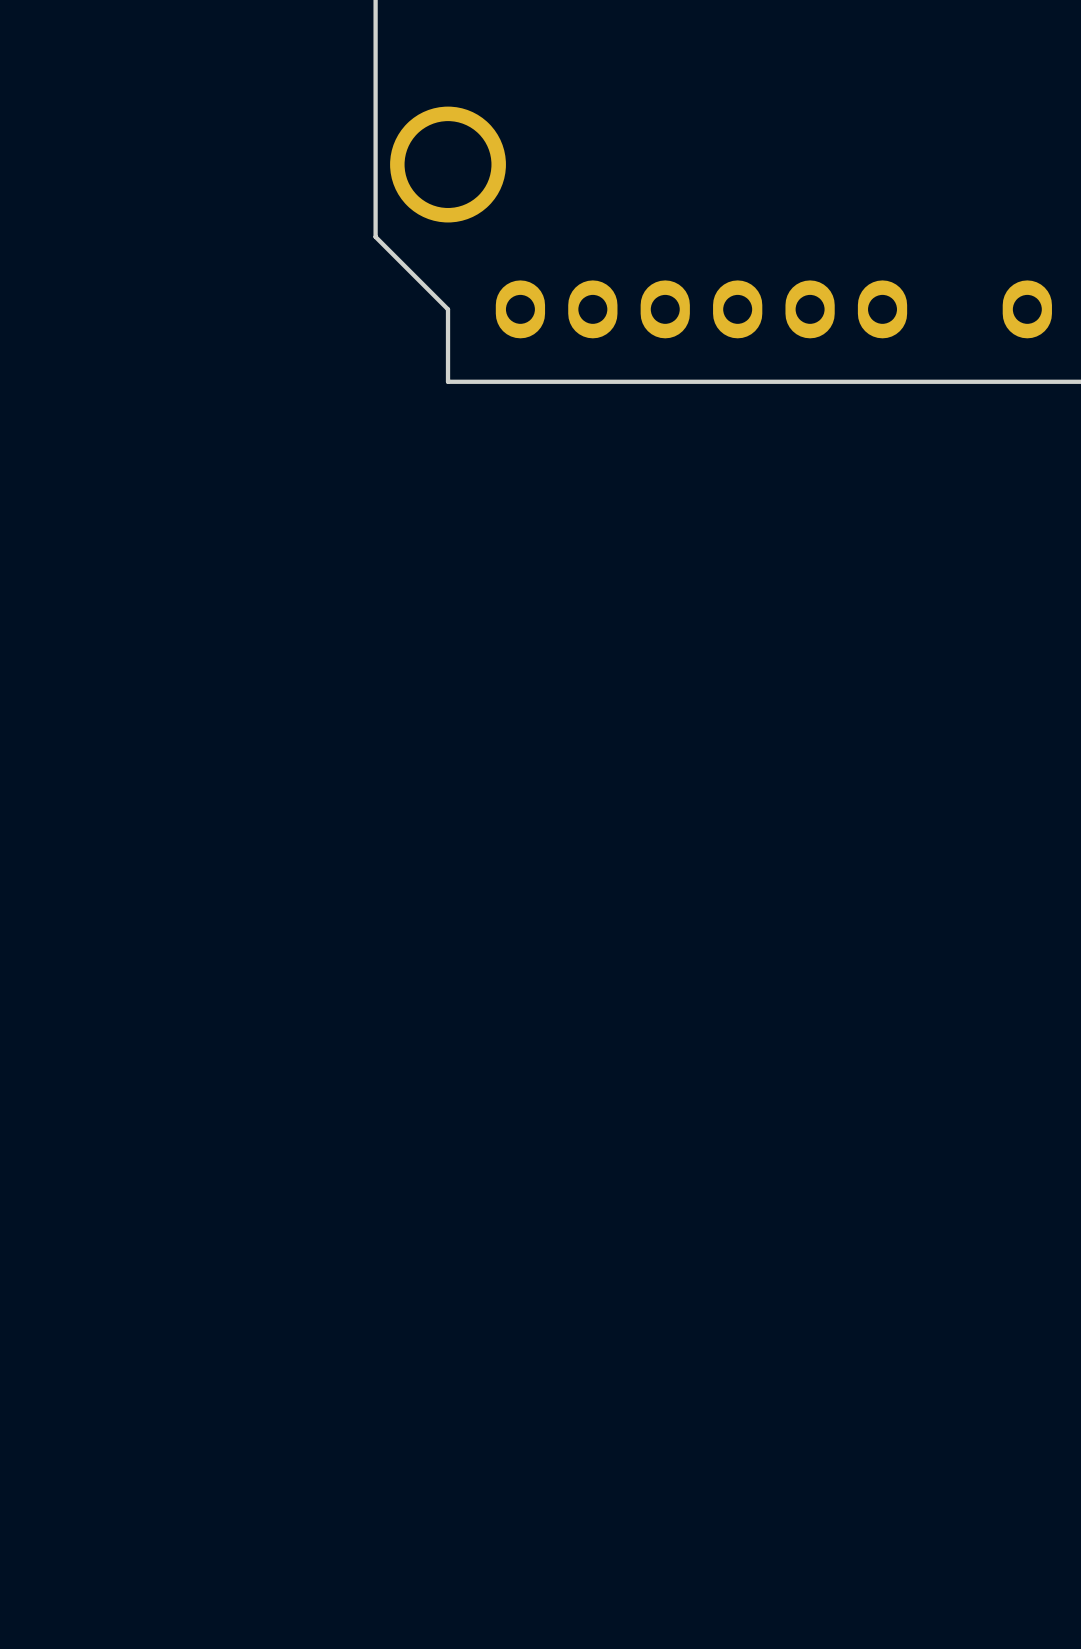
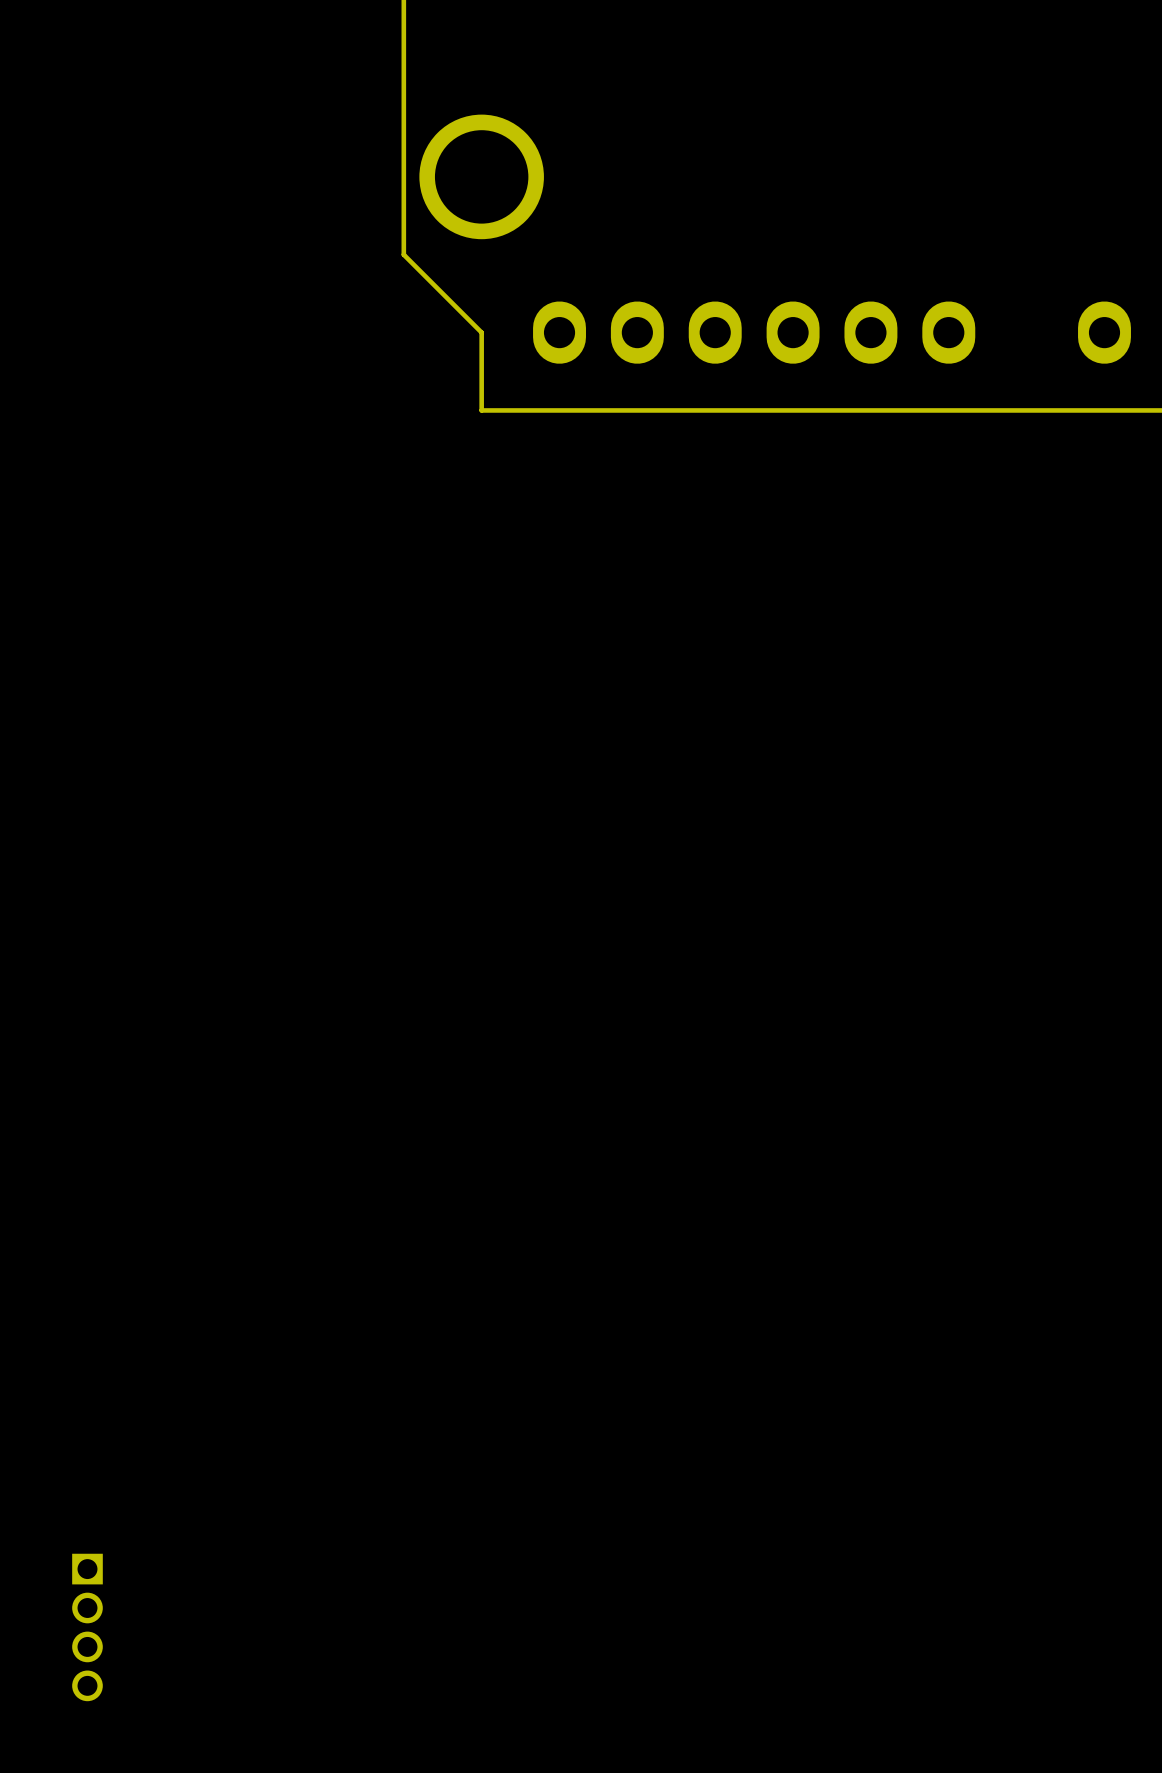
part: none -> (87, 1627)

